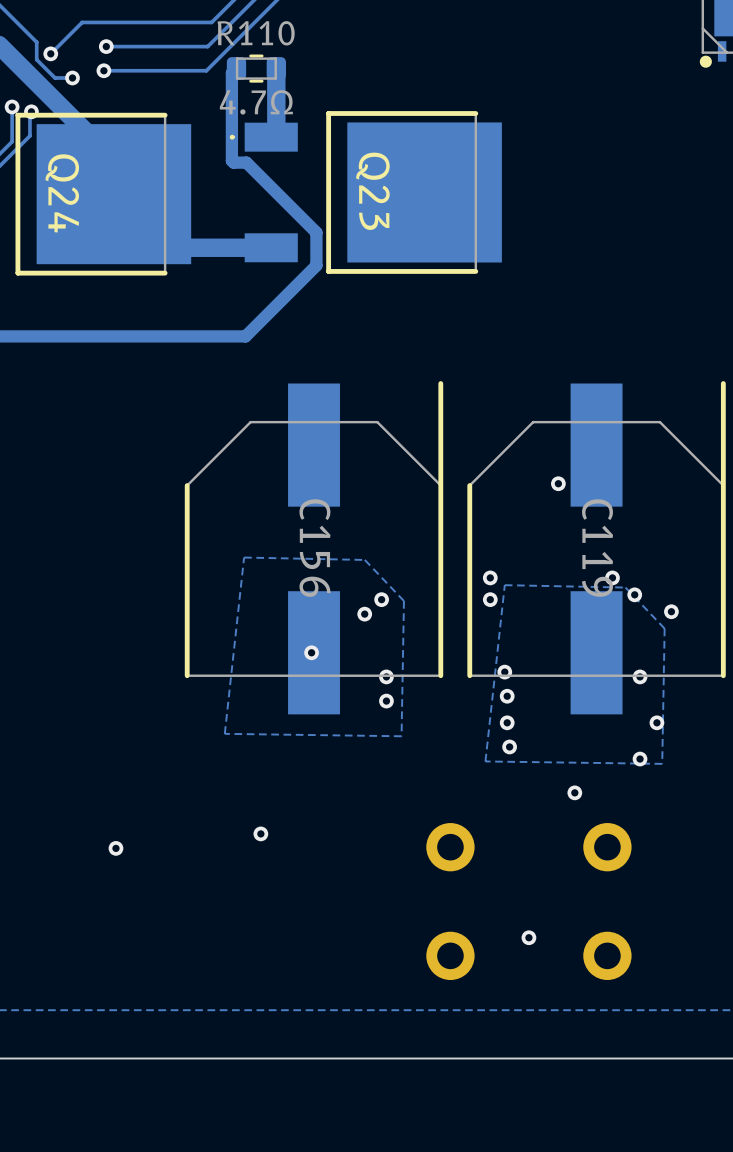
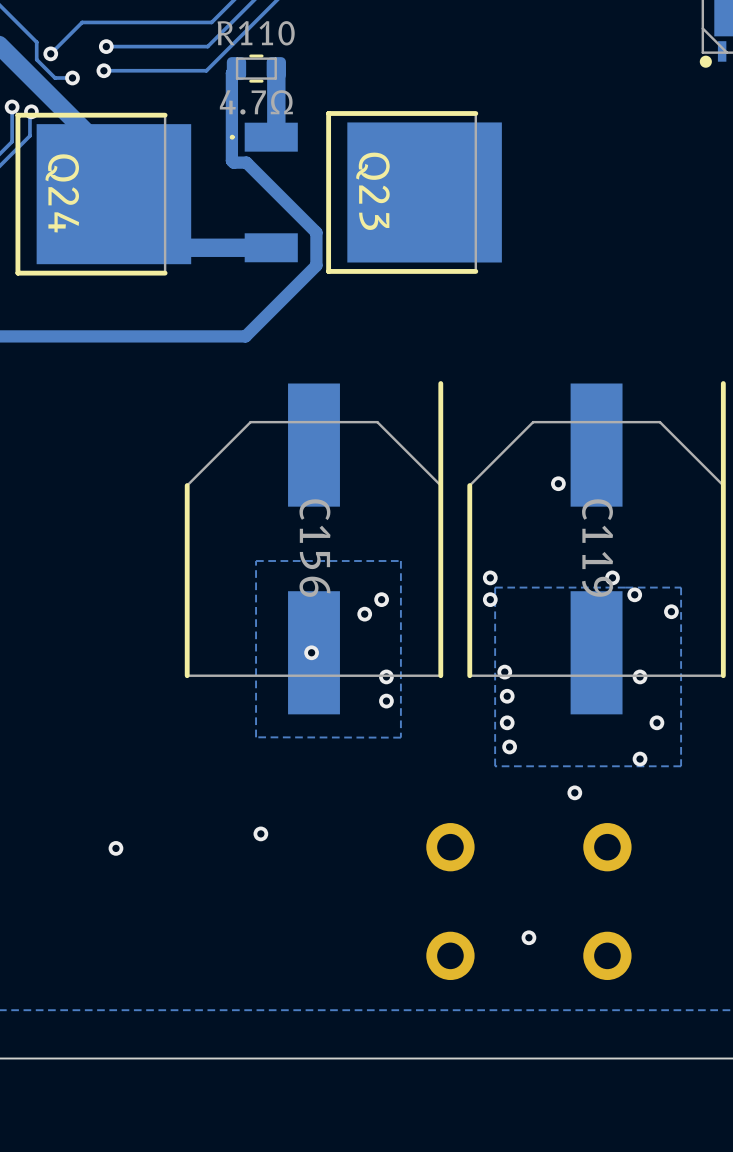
zone outline: (244, 557) (364, 559) (403, 601) (401, 736) (224, 733) (244, 557) -> (400, 561) (400, 737) (256, 737) (256, 561) (400, 561)
zone outline: (504, 585) (625, 587) (664, 628) (662, 763) (485, 761) (504, 585) -> (681, 587) (681, 766) (495, 766) (495, 587) (681, 587)

